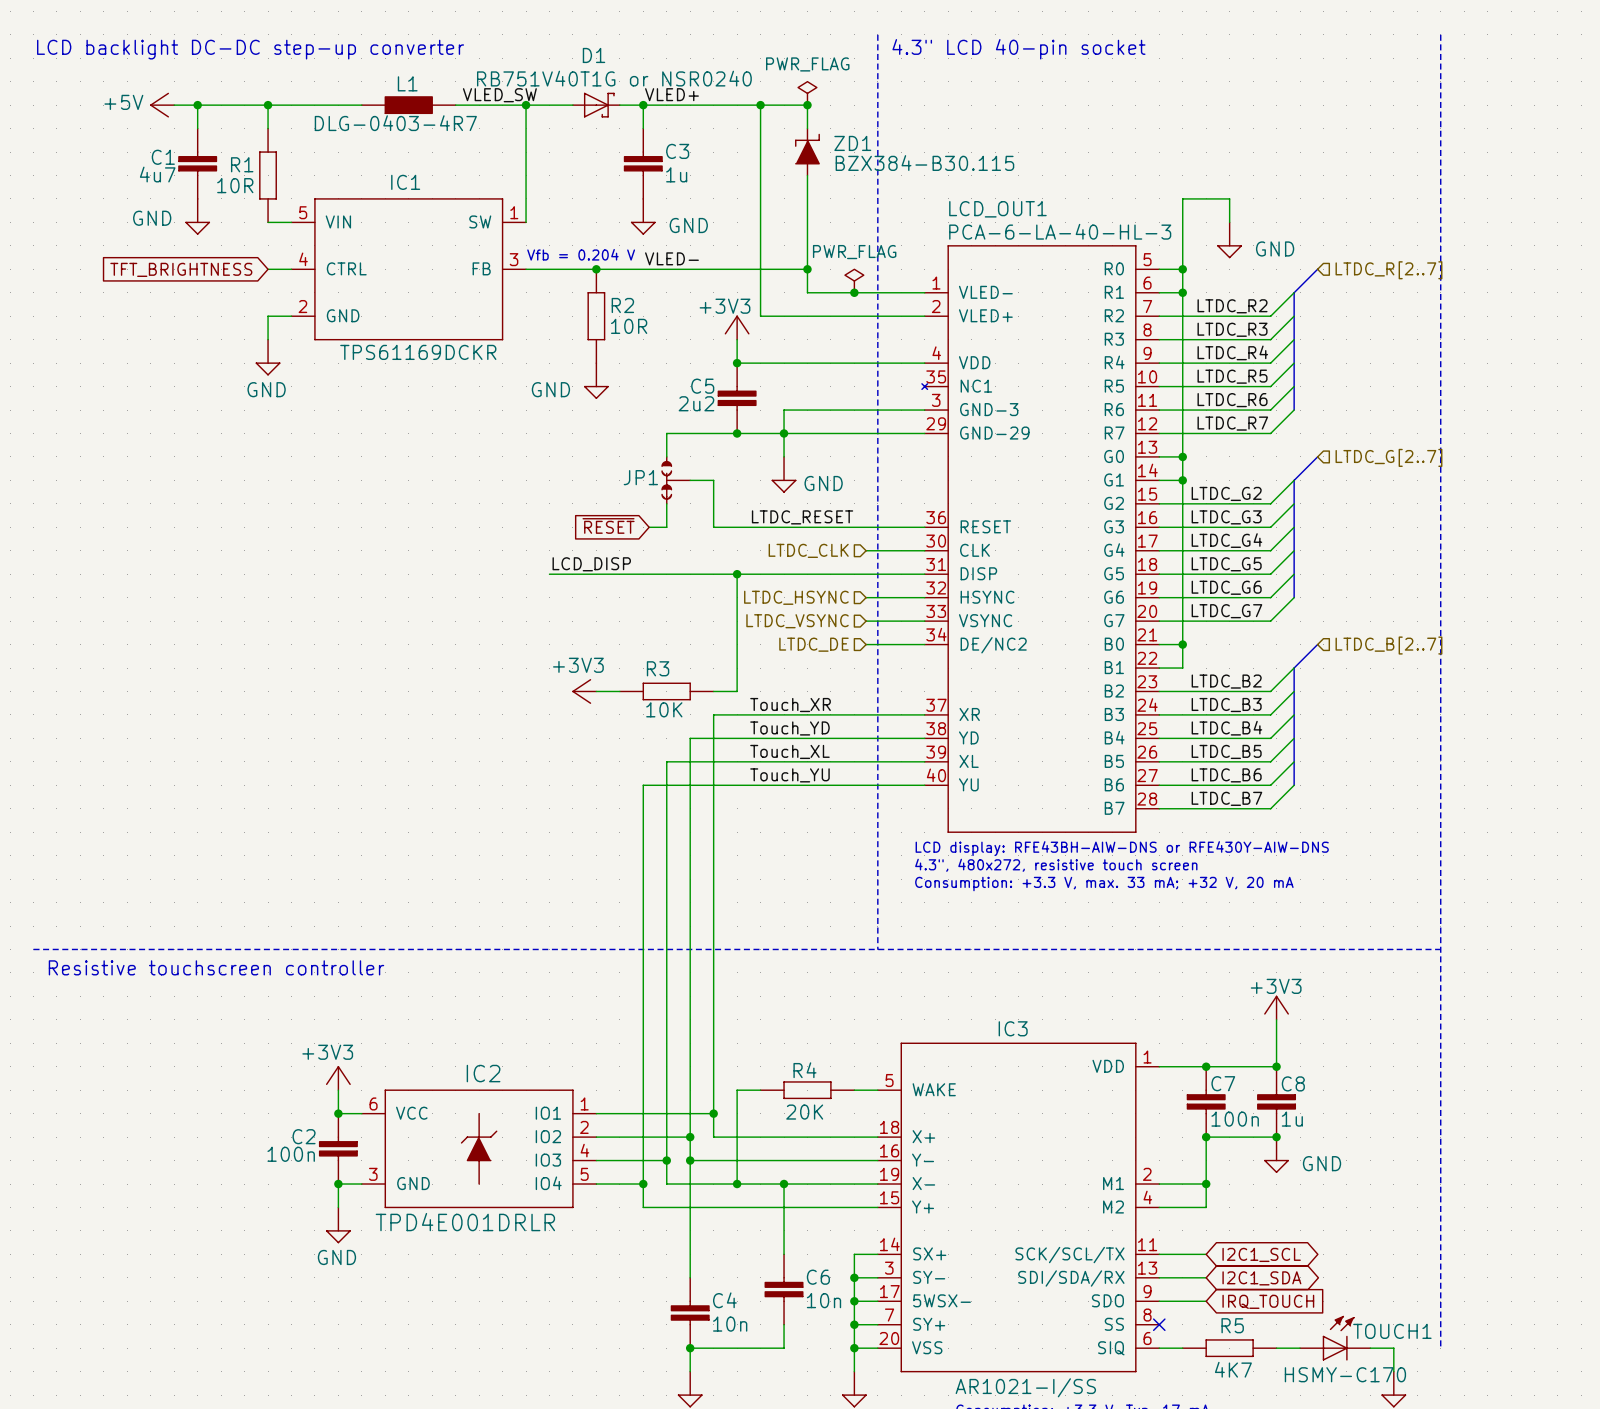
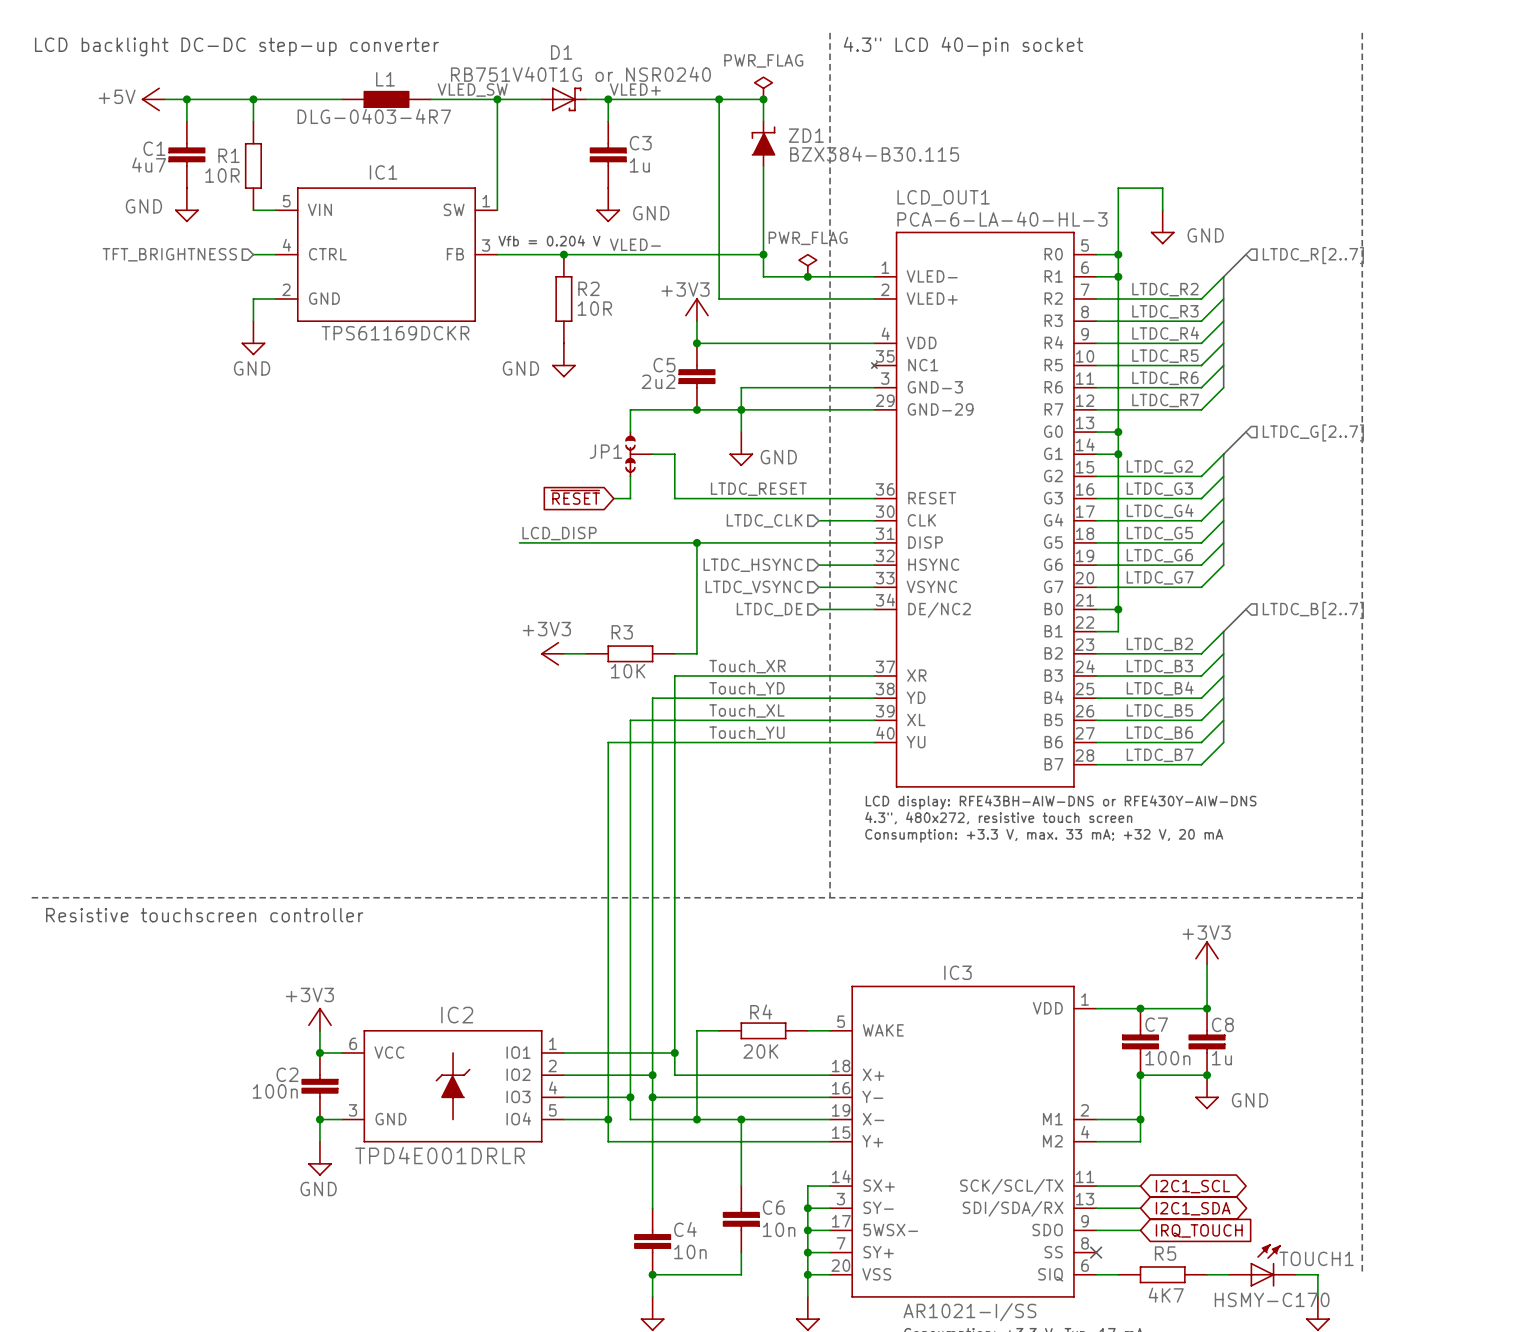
hierarchical label: none -> TFT_BRIGHTNESS (169, 254)
global label: TFT_BRIGHTNESS (181, 269) -> none

